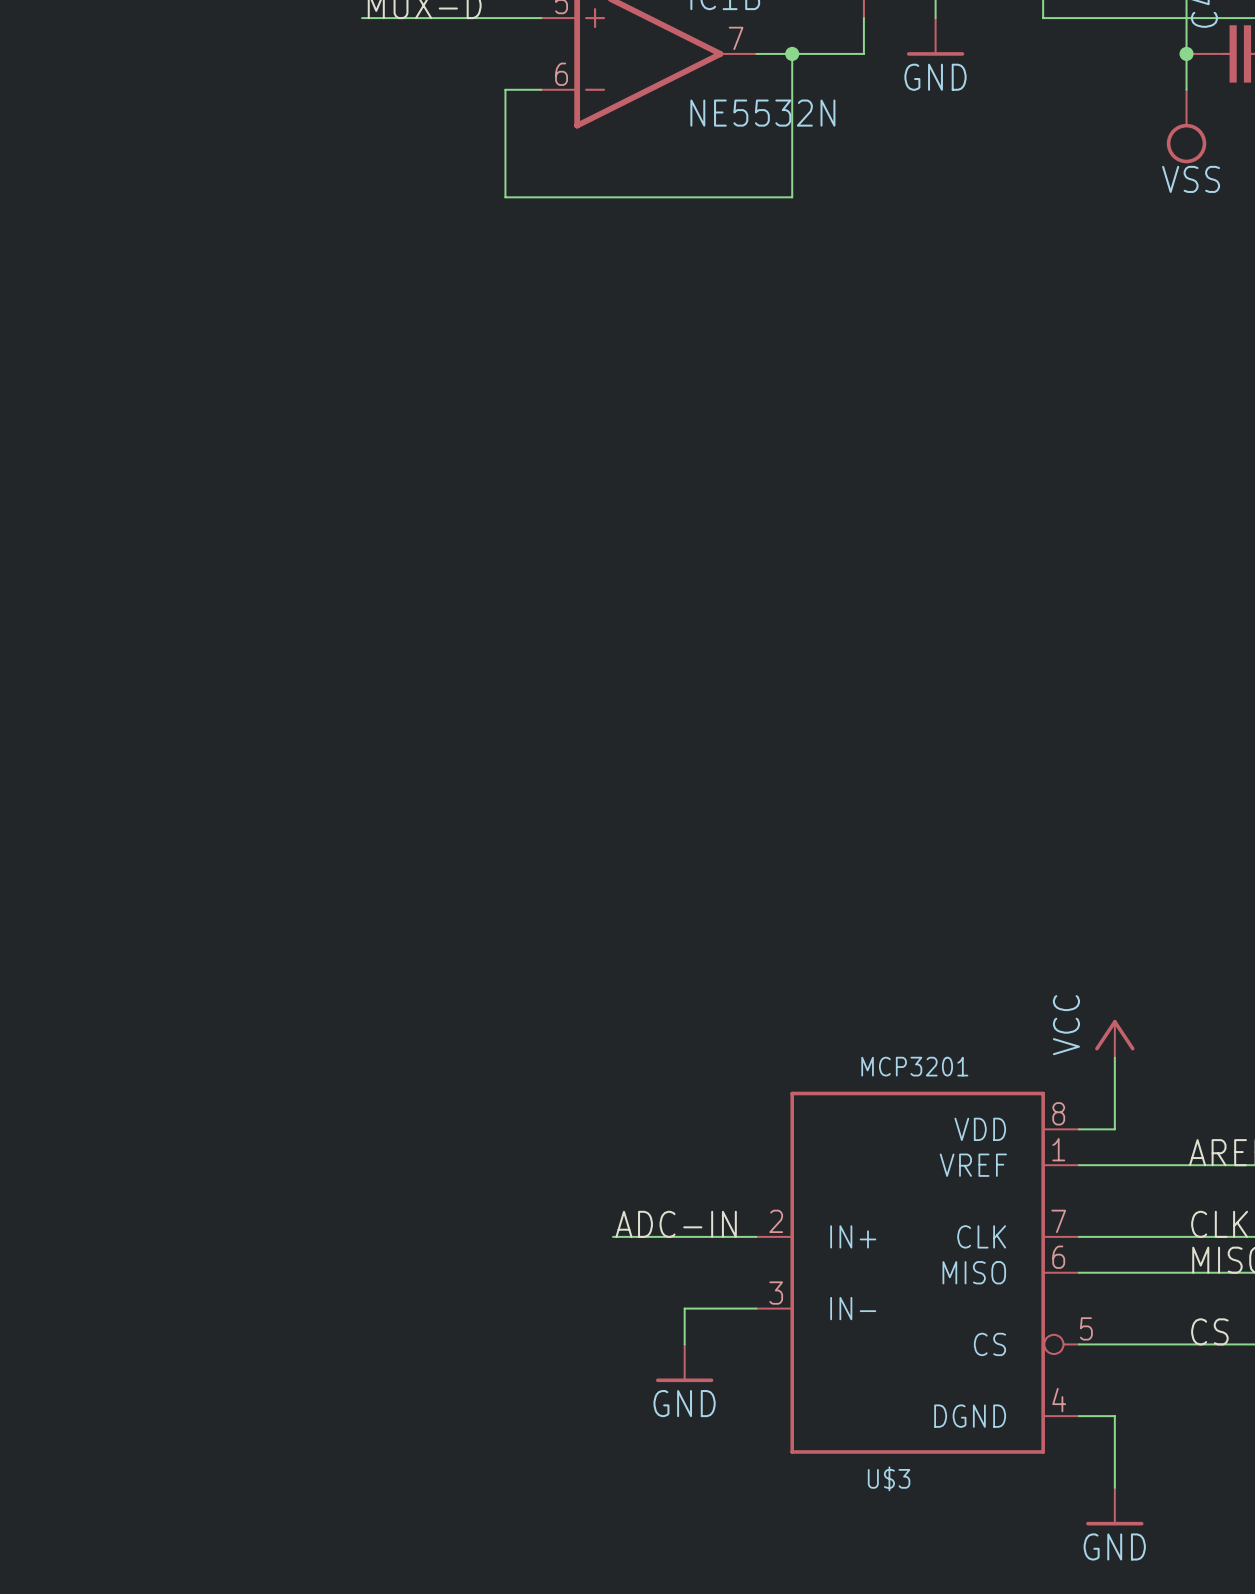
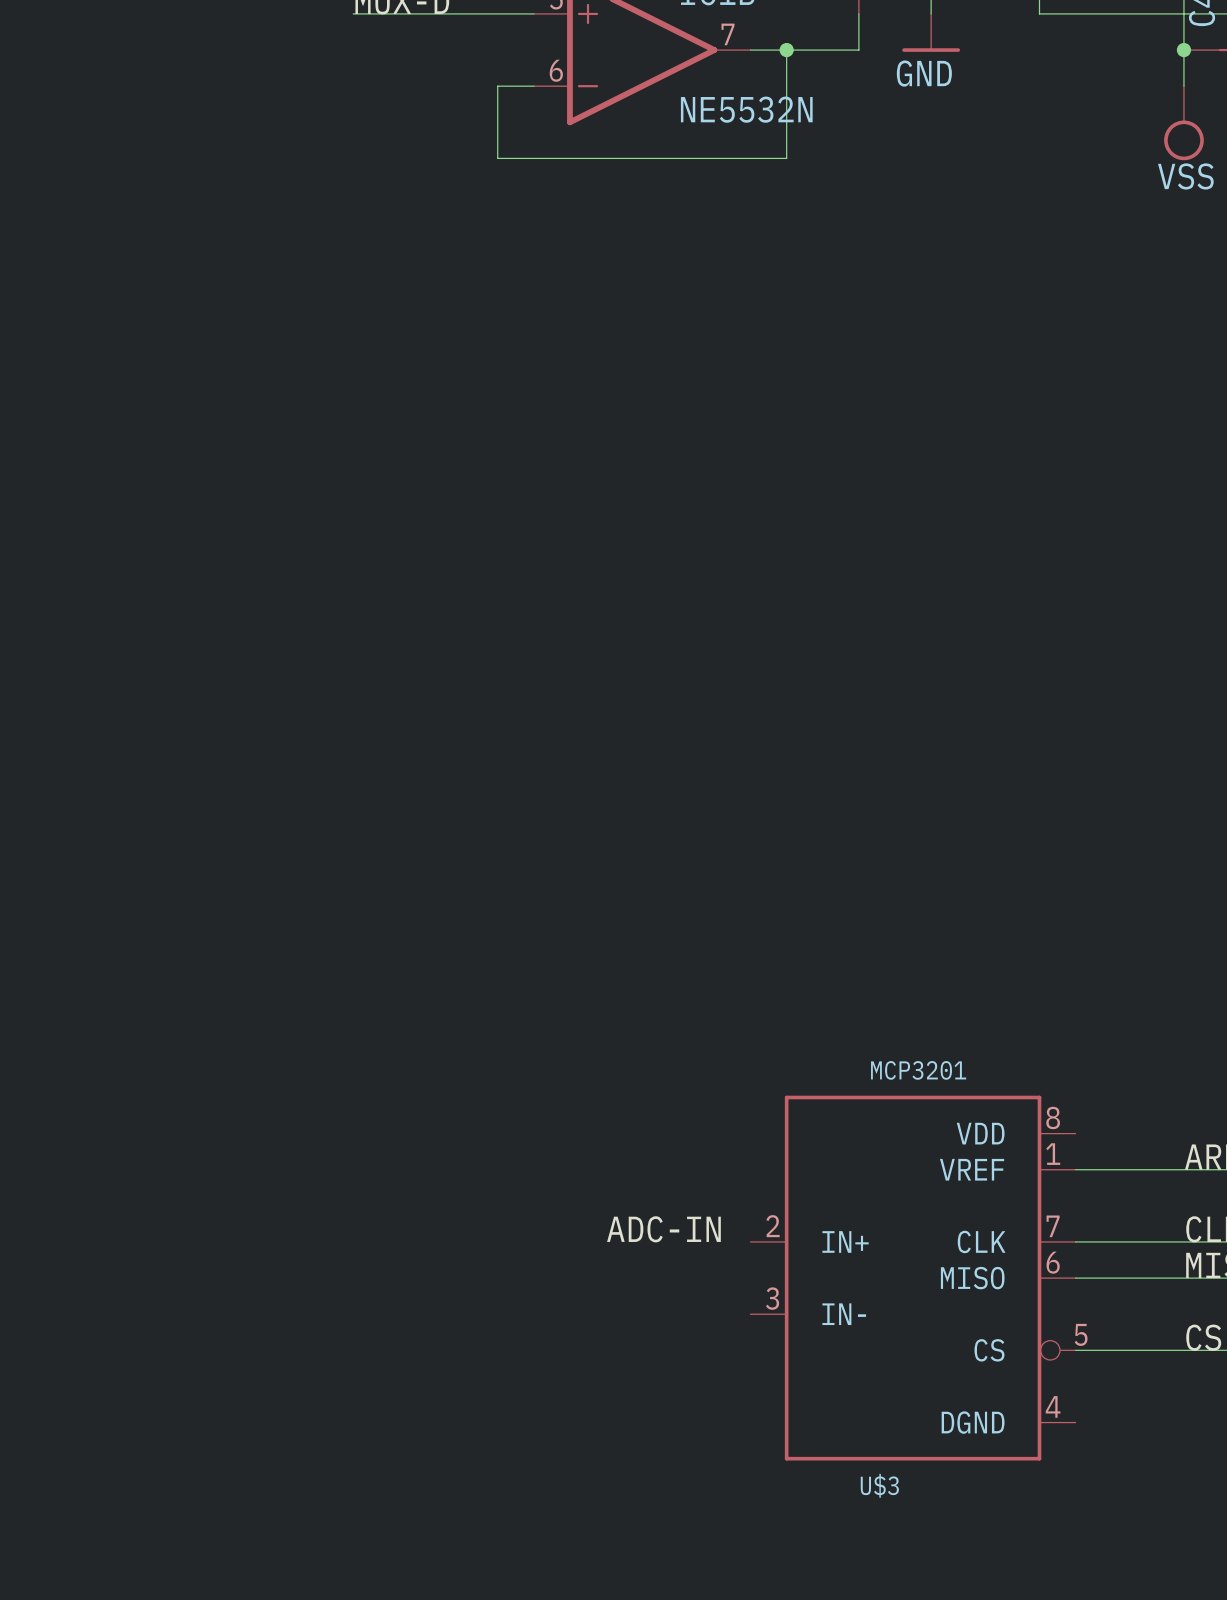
wire: (505, 161) (505, 197) (792, 197) (792, 161) -> (497, 158) (786, 158)
power symbol: VCC (1114, 1038) -> none
wire: (1114, 1057) (1114, 1129) (1079, 1129) -> none
wire: (612, 1236) (756, 1236) -> none
wire: (756, 1308) (684, 1308) (684, 1344) -> none
power symbol: GND (684, 1363) -> none
wire: (1079, 1416) (1114, 1416) (1114, 1487) -> none
power symbol: GND (1114, 1506) -> none

